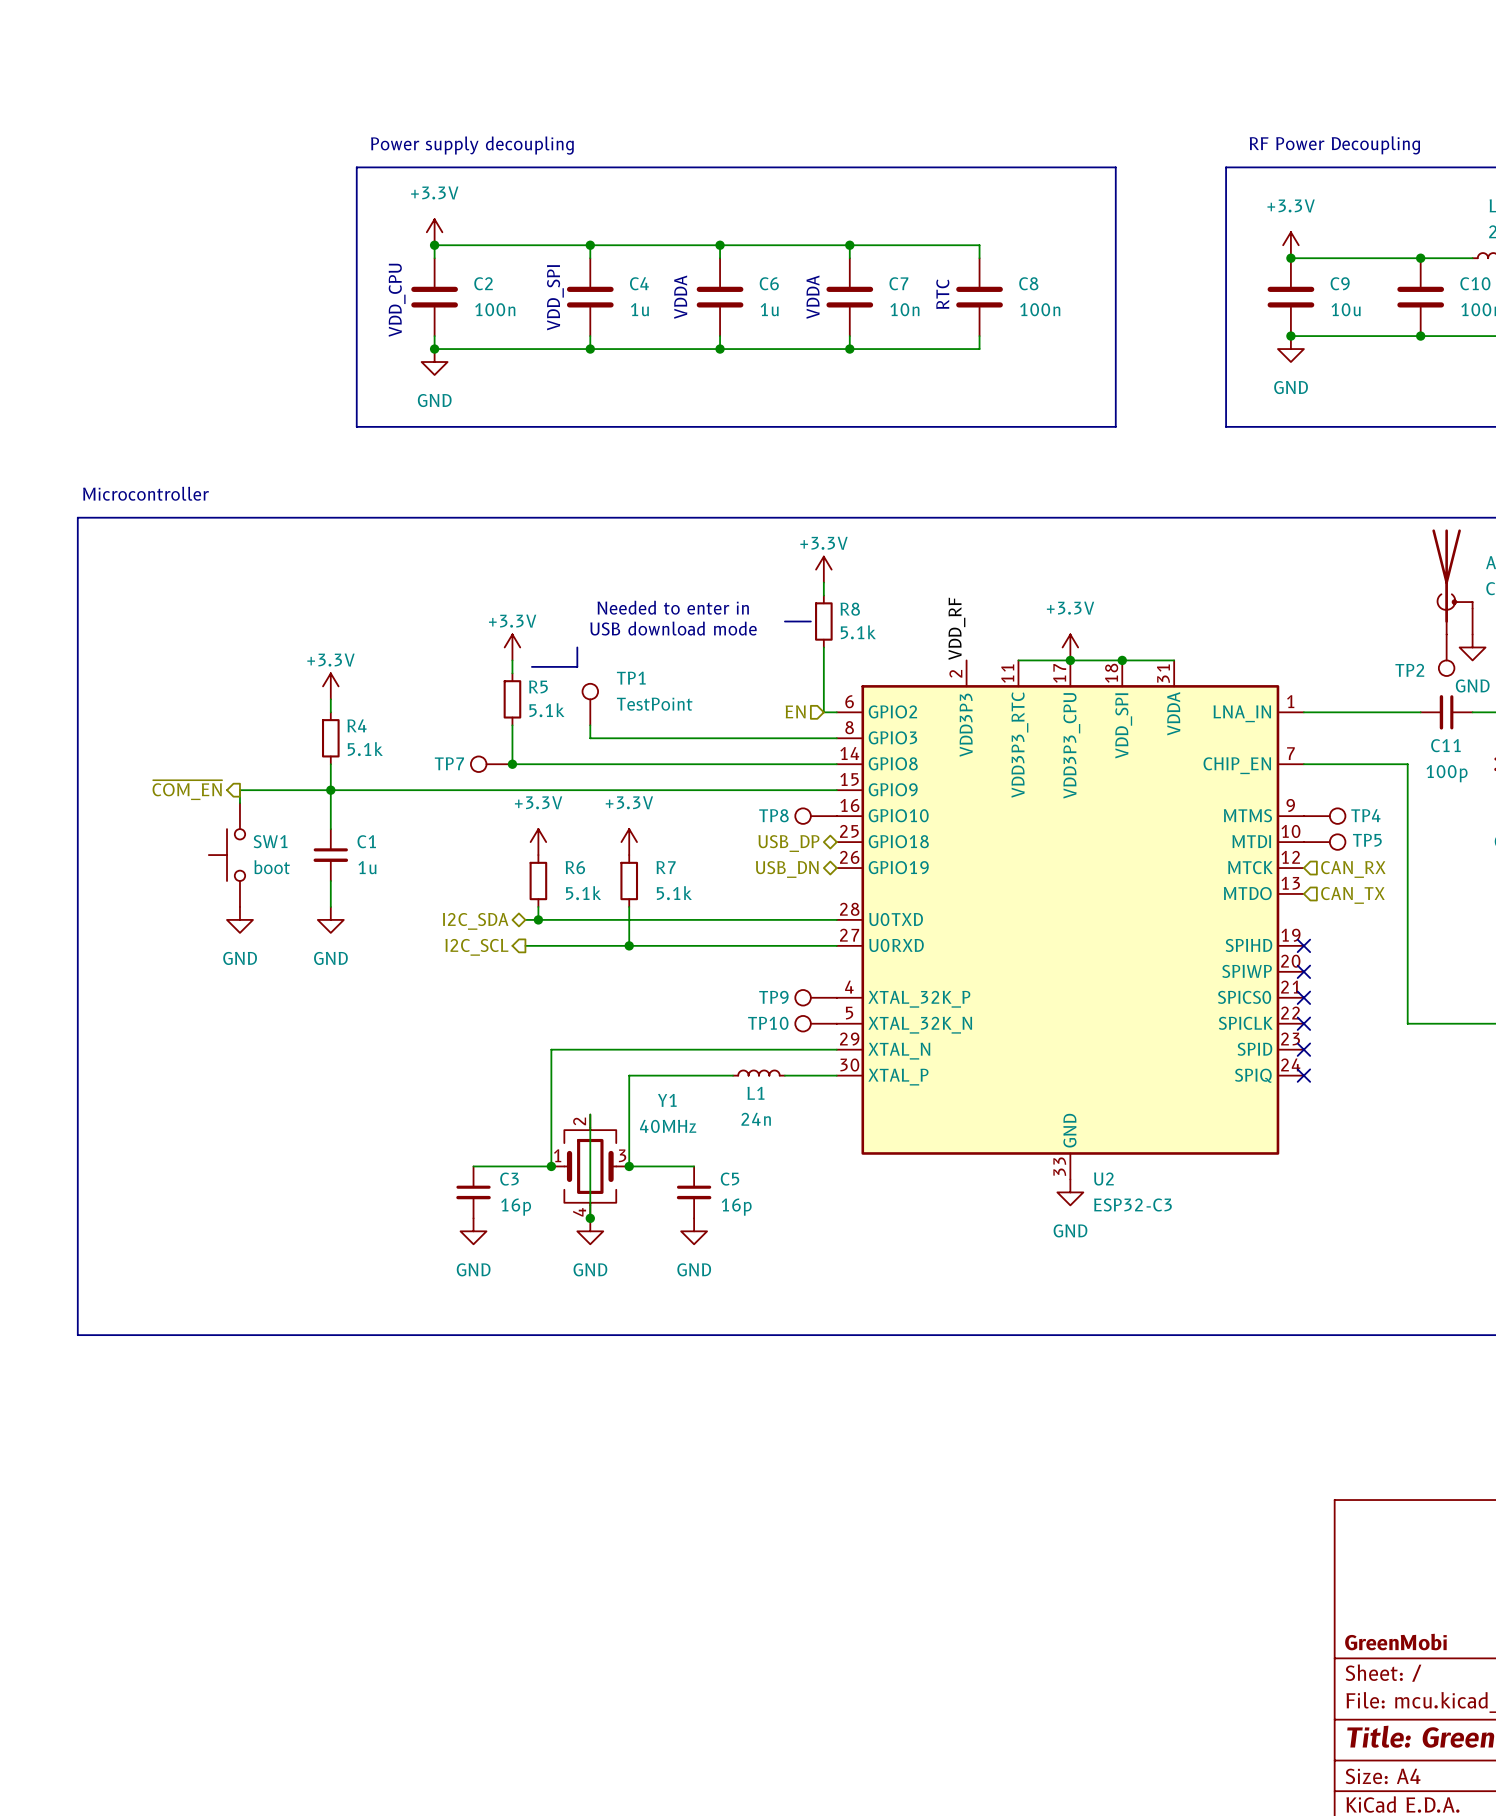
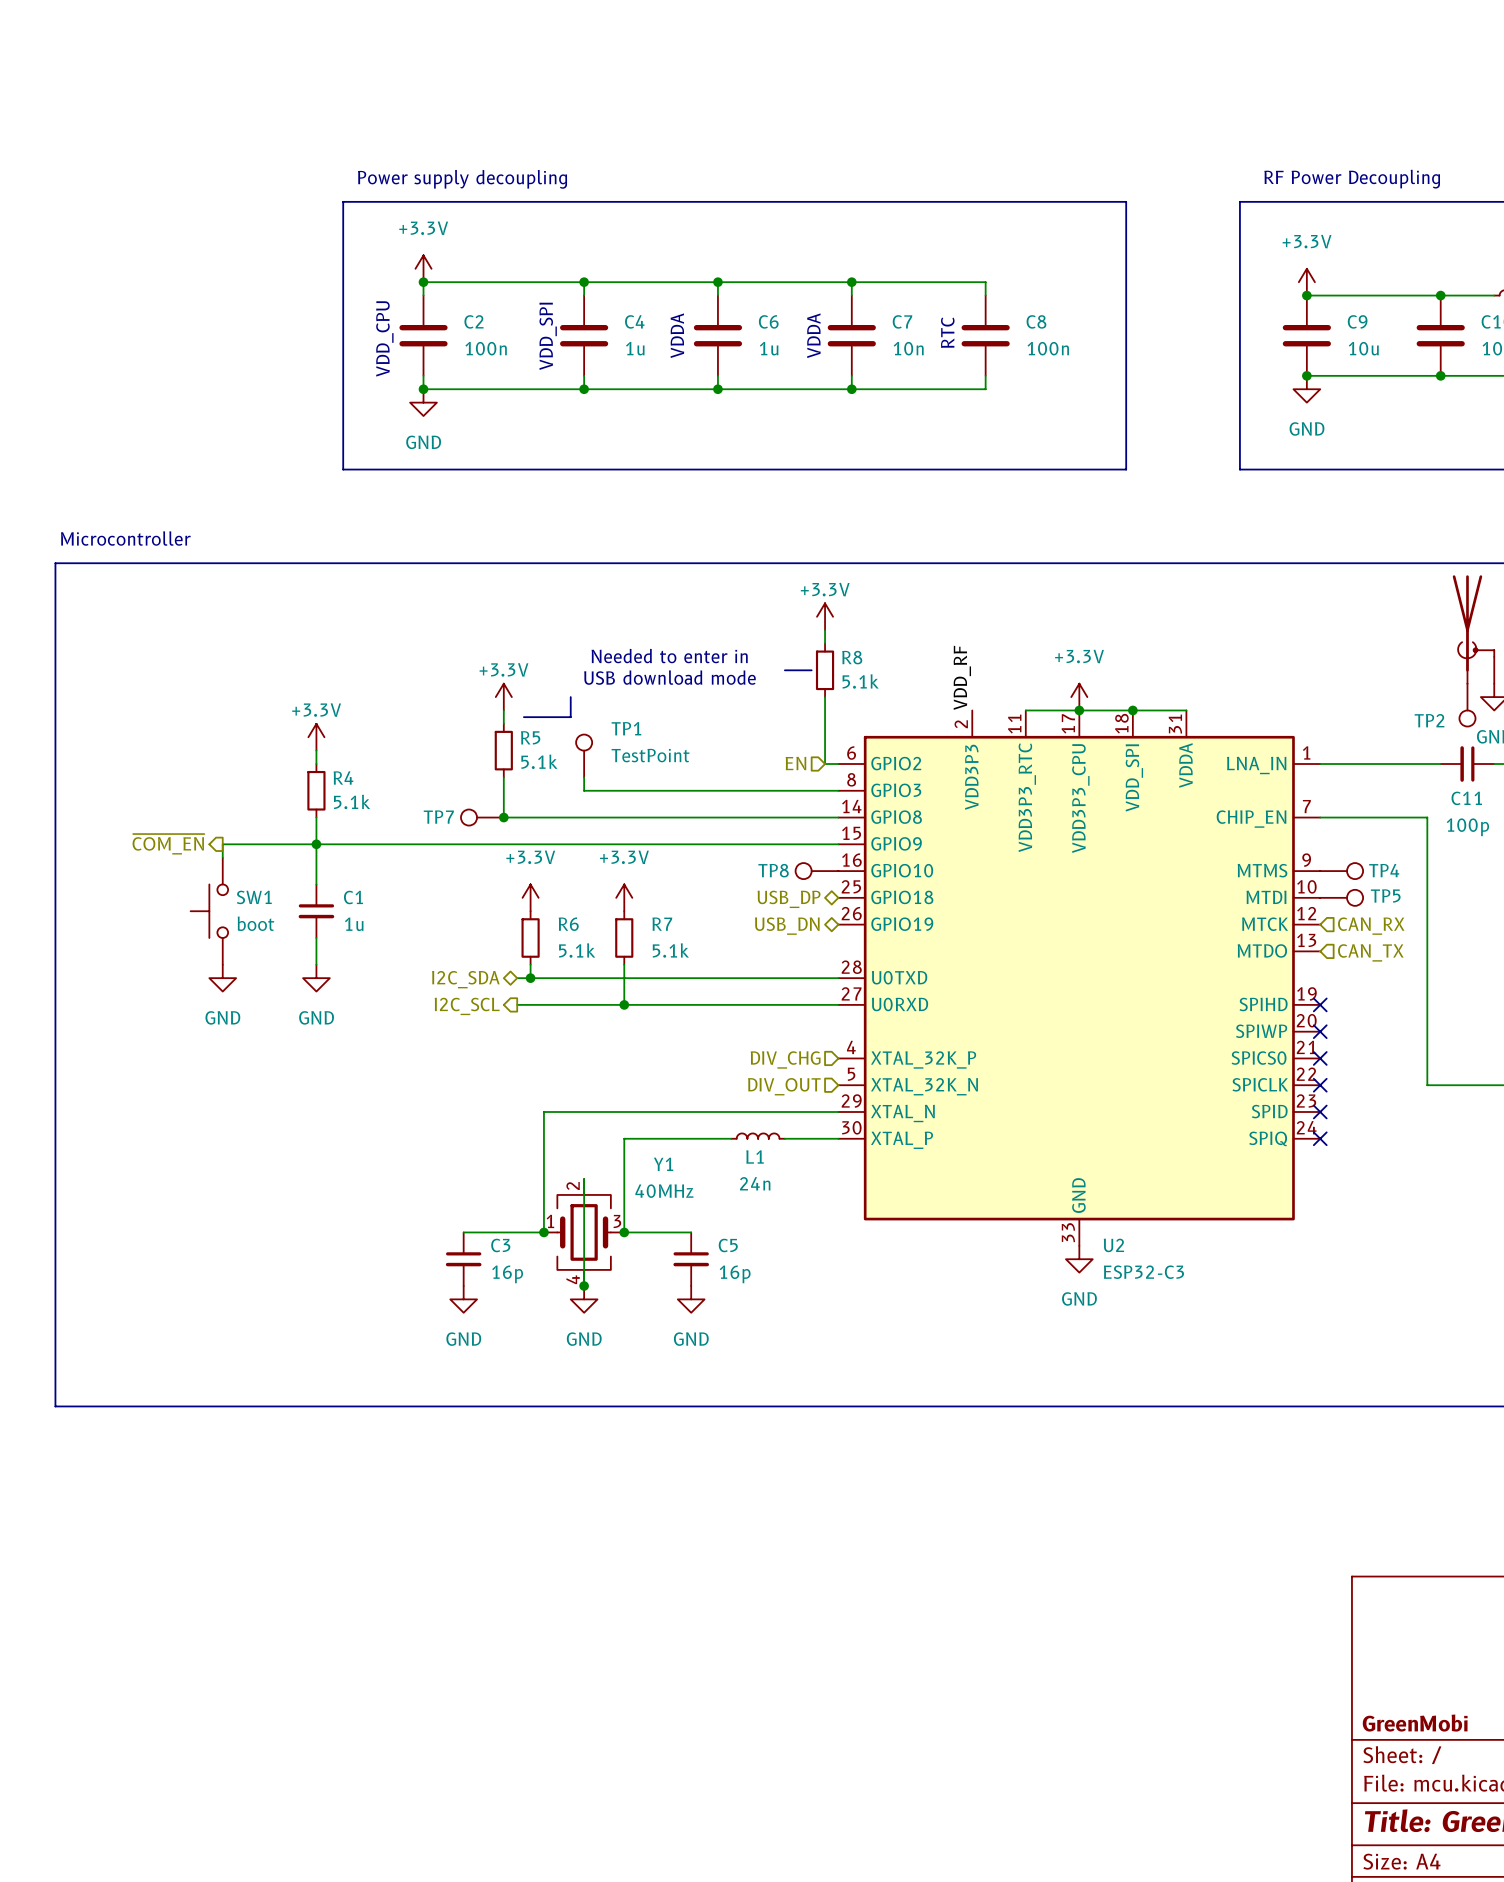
TP9: (816, 997) -> none
hierarchical label: none -> DIV_CHG (785, 1059)
TP10: (816, 1023) -> none
hierarchical label: none -> DIV_OUT (784, 1086)

